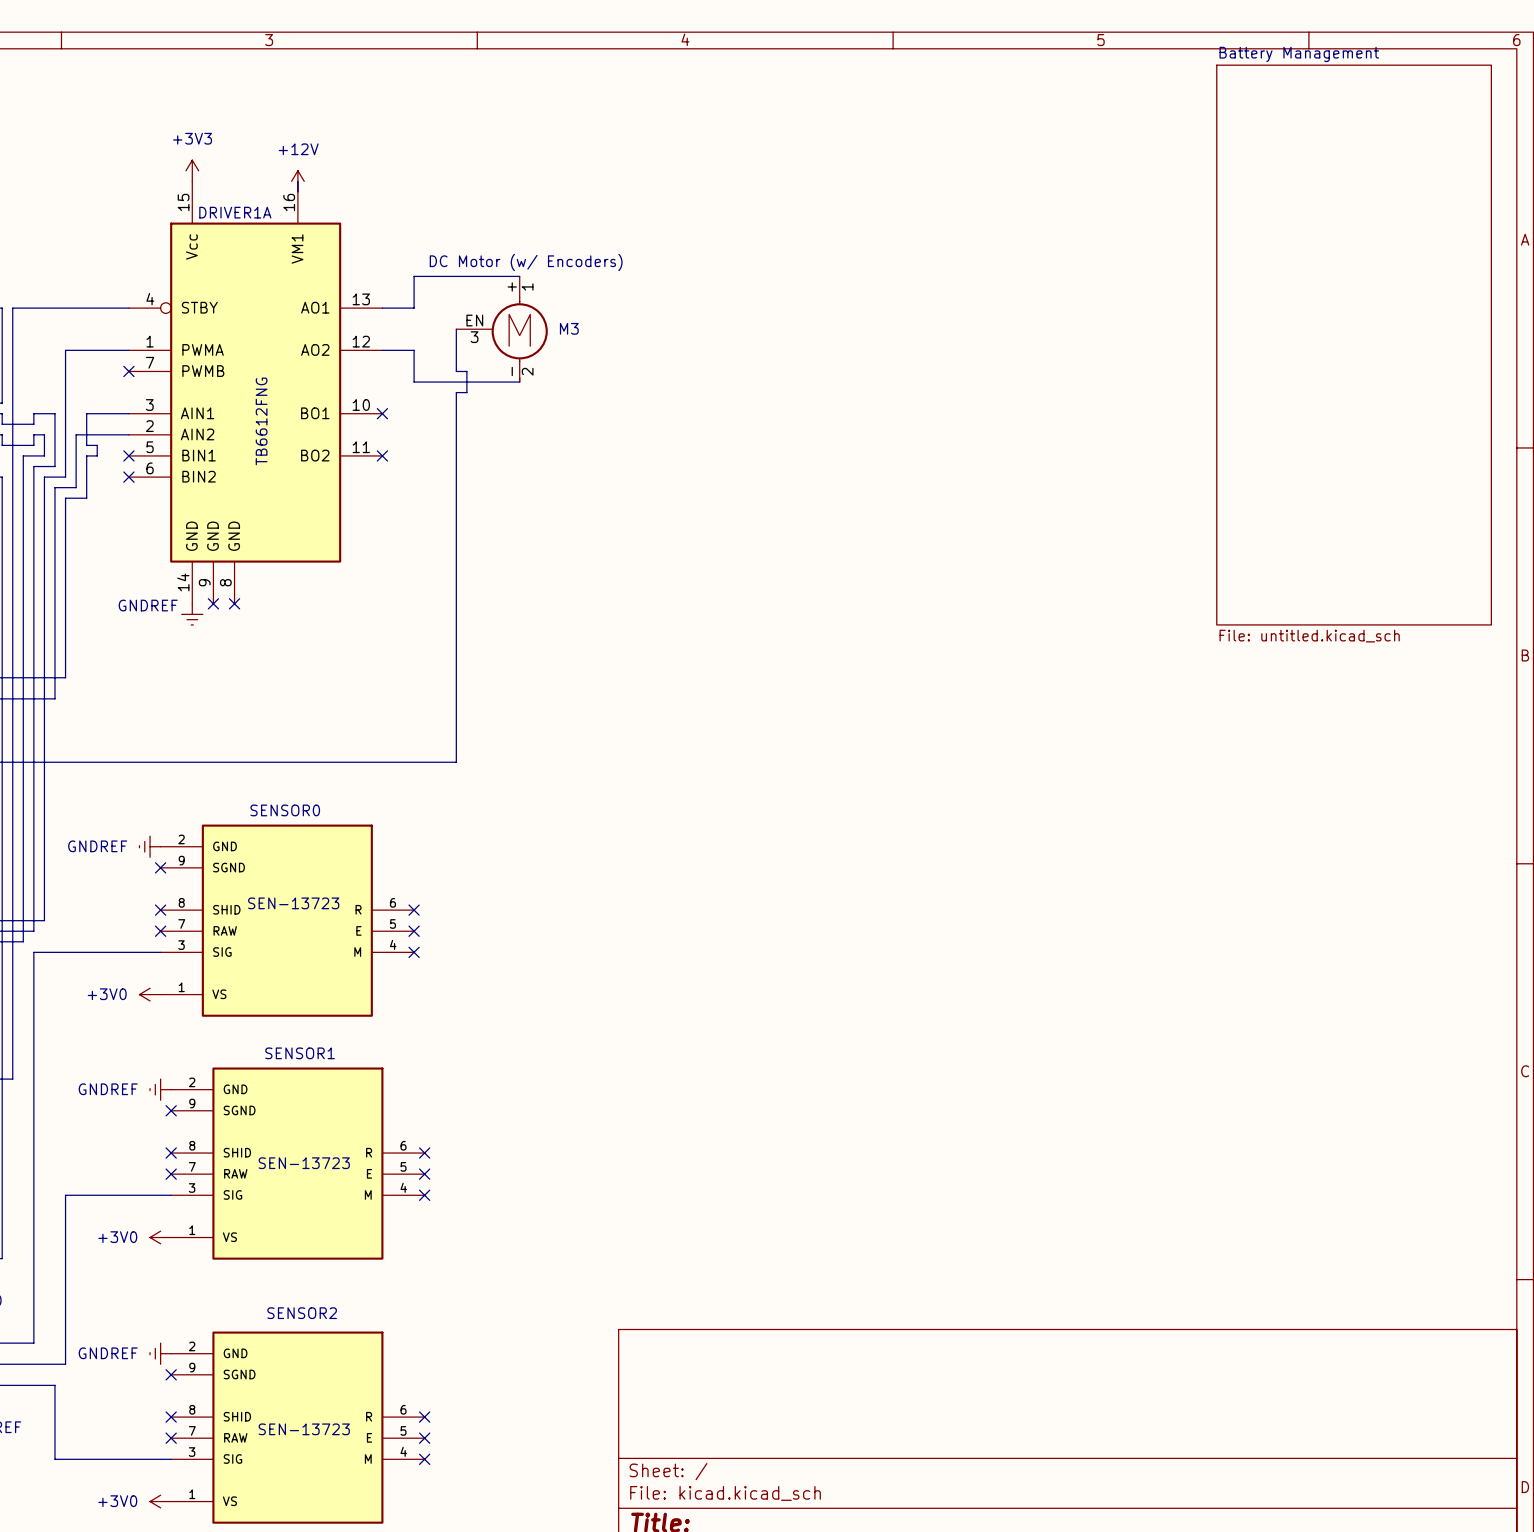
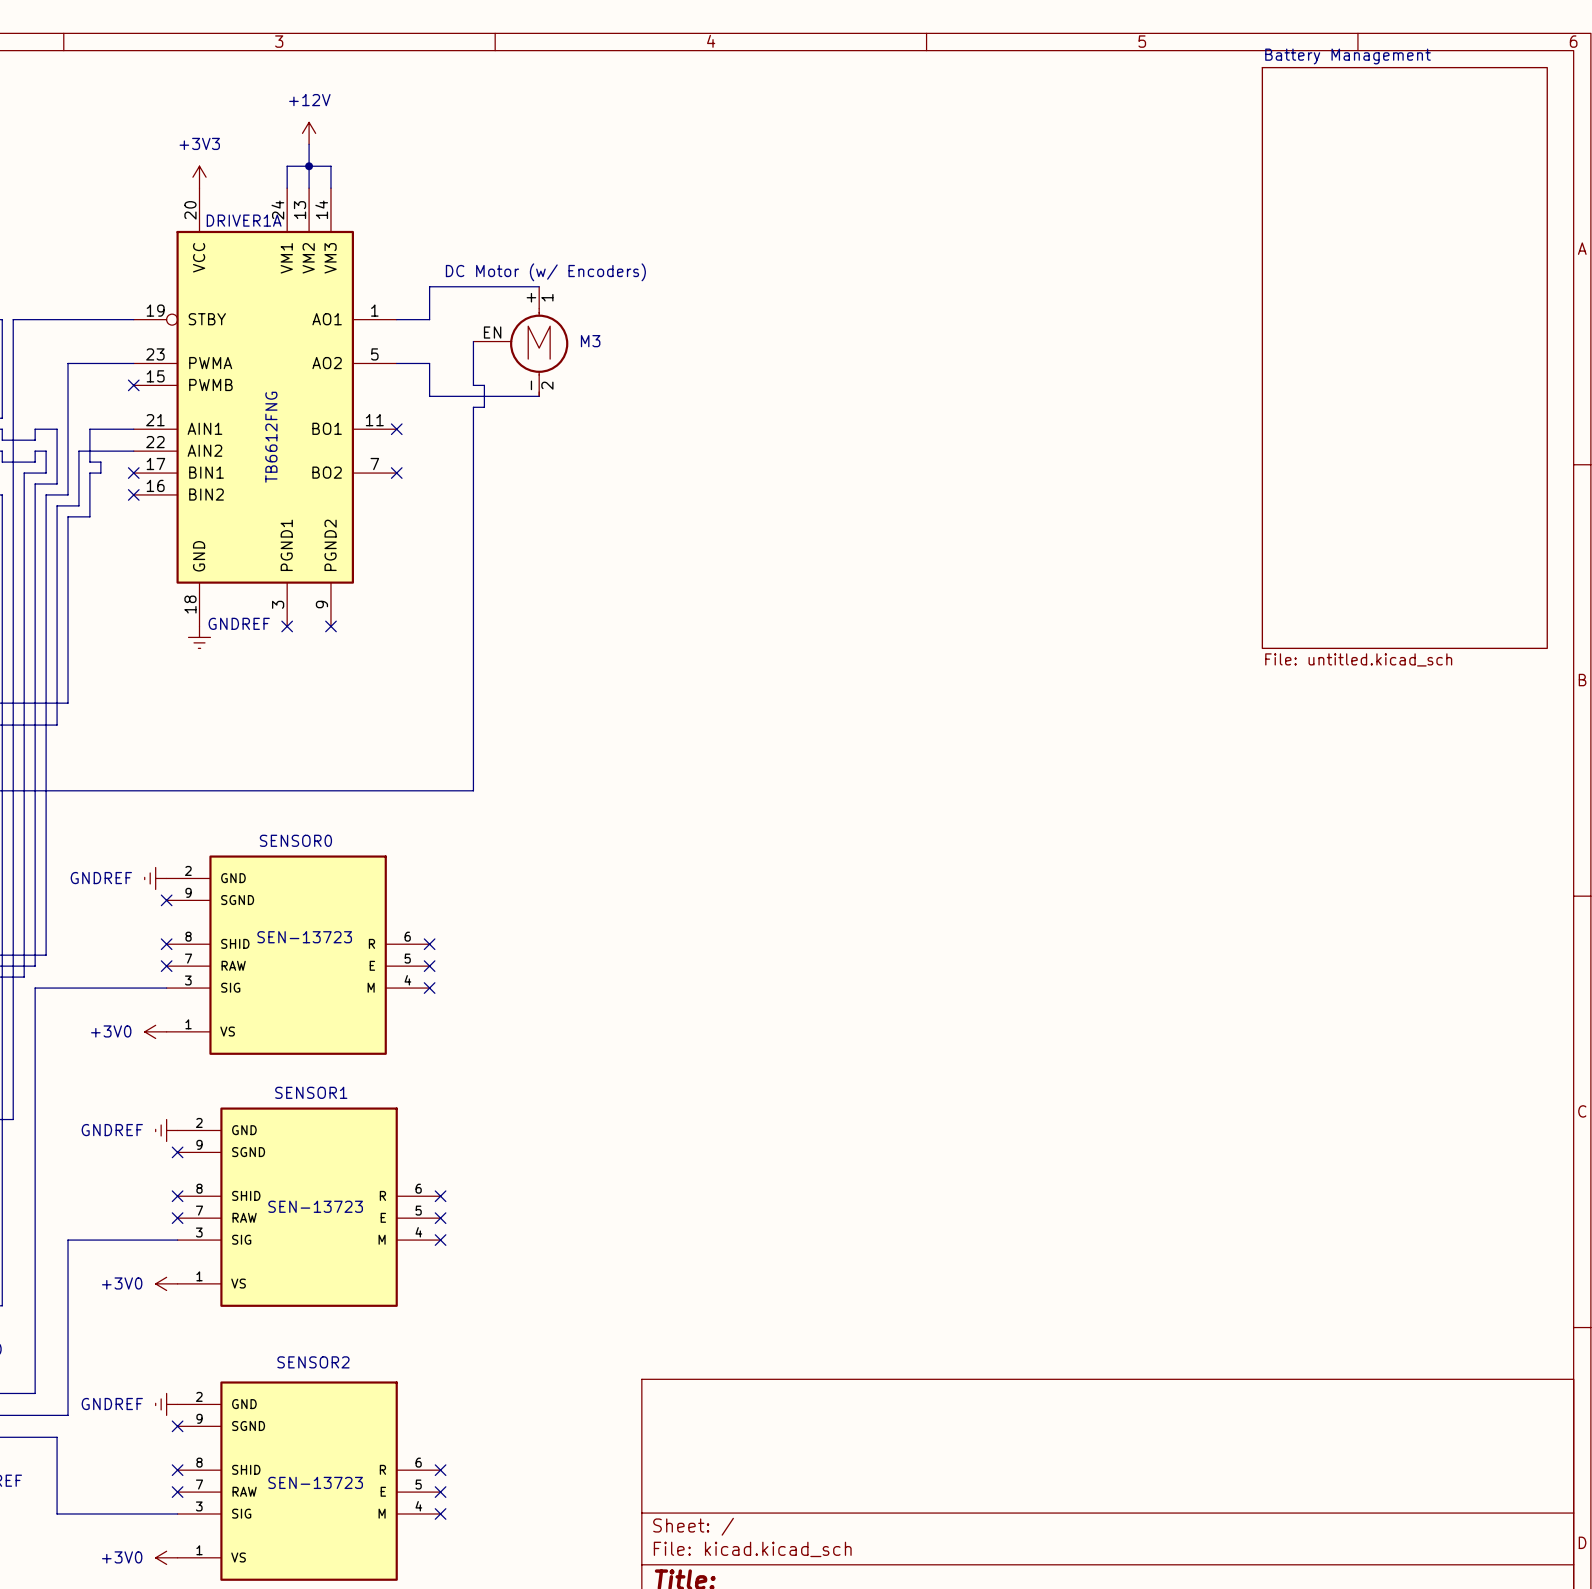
junction: none -> (309, 166)
DRIVER1A symbol: [128, 181, 383, 604] -> [133, 188, 397, 627]
wire: none -> (287, 188) (287, 166) (330, 166) (330, 188)
power symbol position: +12V (297, 181) -> +12V (309, 133)
M3 pin number: 3 (474, 337) -> none
no-connect mark: (213, 603) -> none
no-connect mark: (234, 603) -> none
no-connect mark: none -> (287, 626)
no-connect mark: none -> (330, 626)
power symbol text position: GNDREF (148, 605) -> GNDREF (239, 623)

